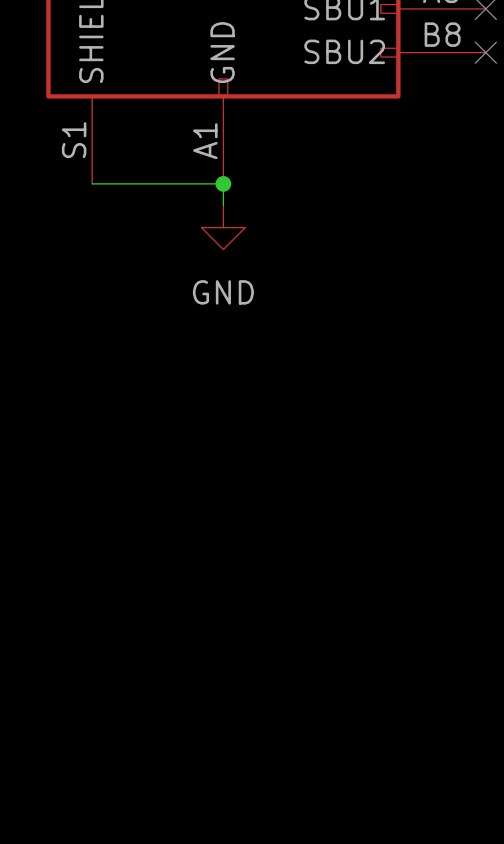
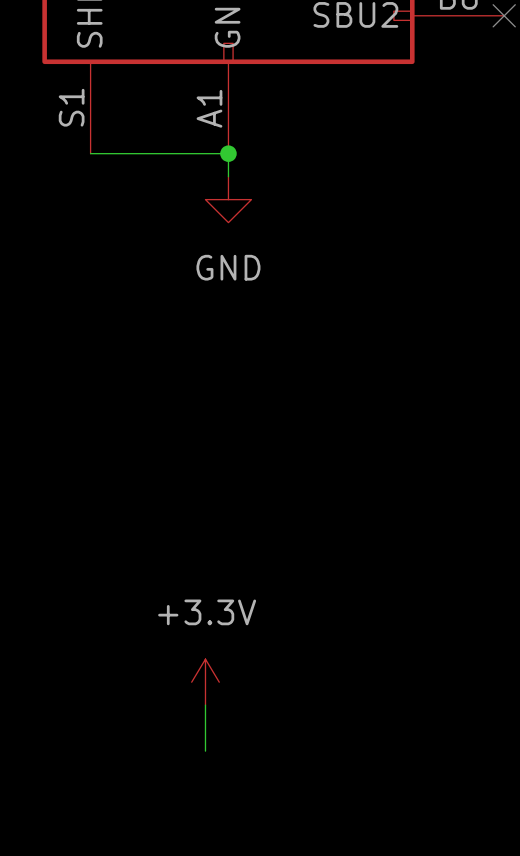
power symbol: none -> +3.3V (205, 682)
wire: none -> (205, 705) (205, 751)

